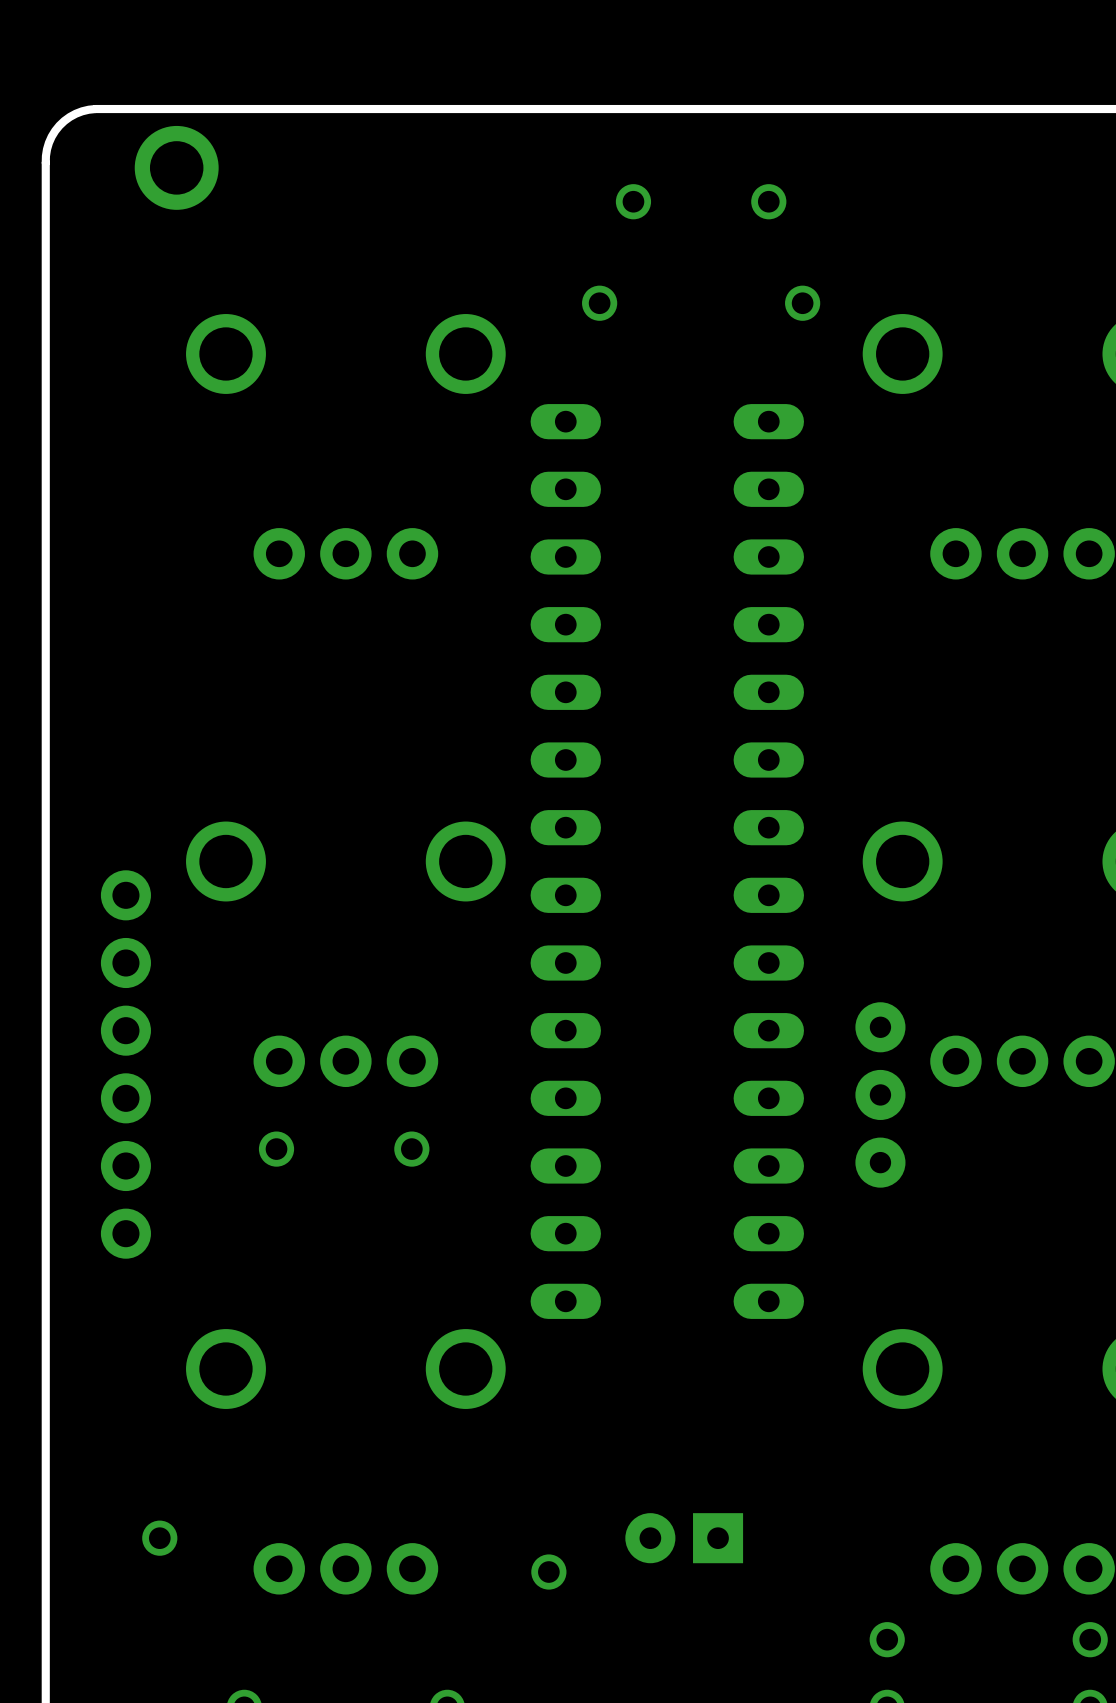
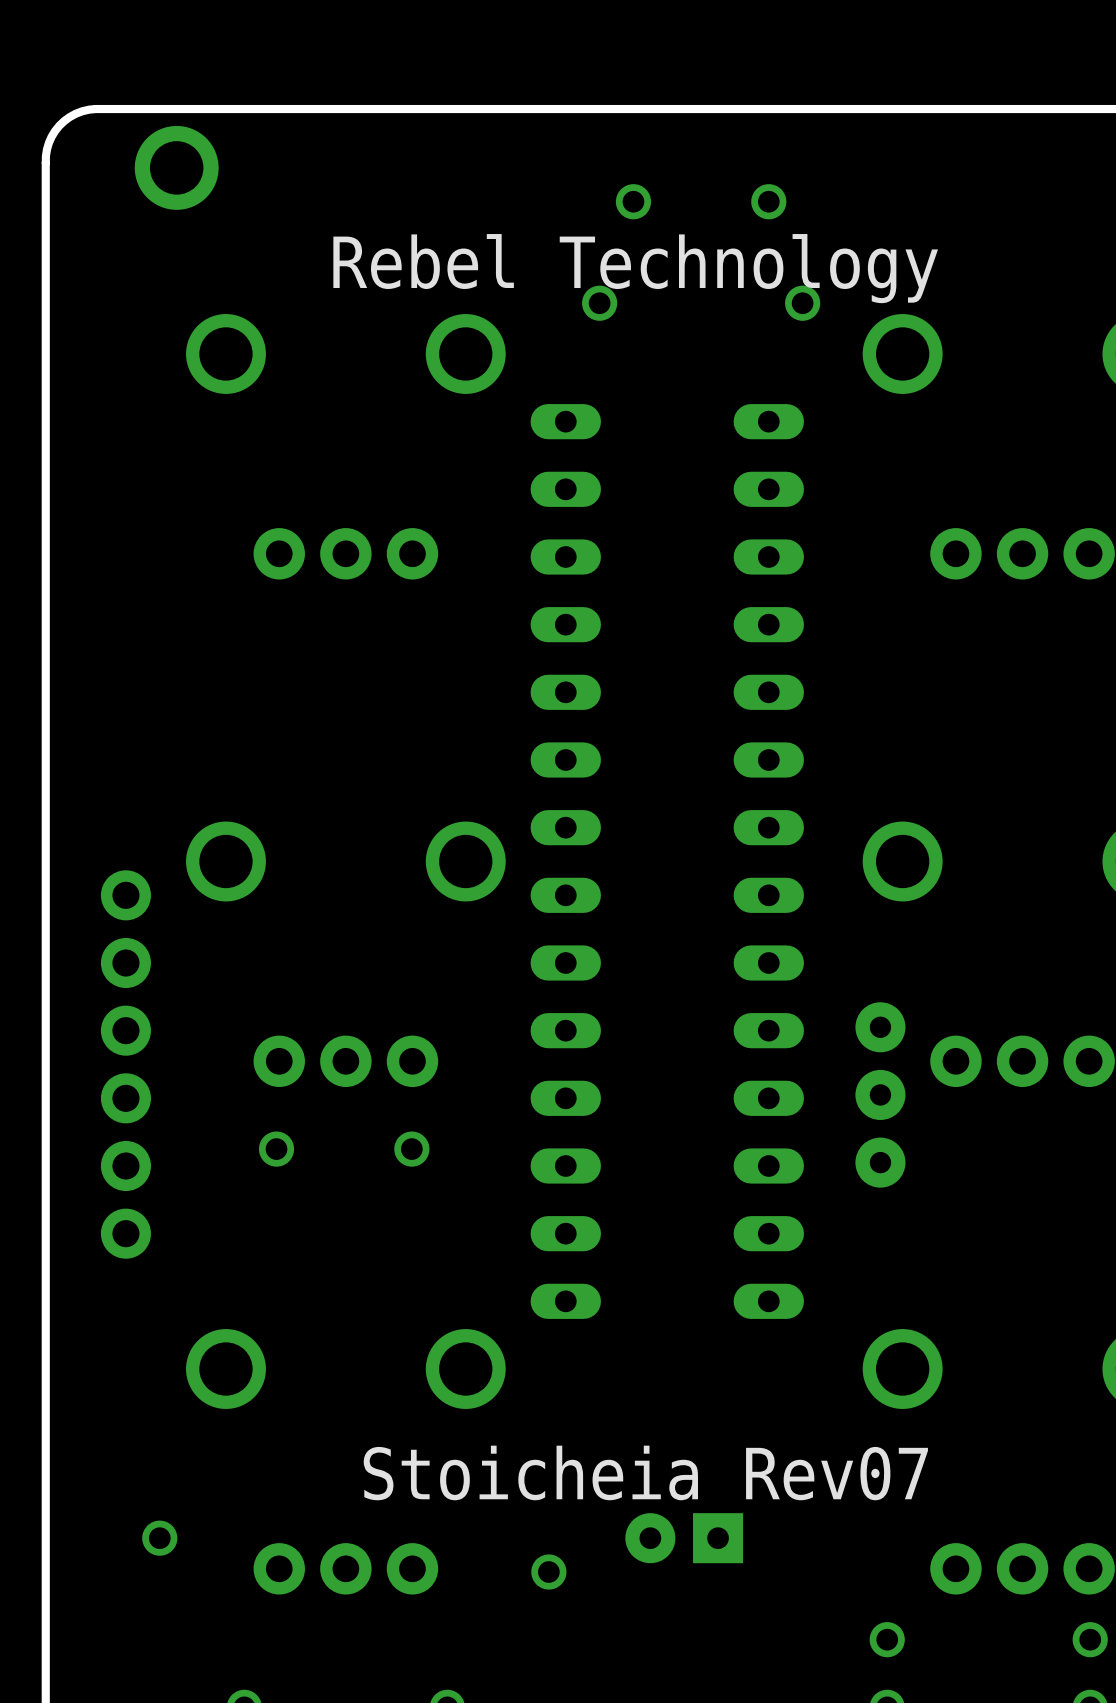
text: none -> Rebel Technology (635, 268)
text: none -> Stoicheia Rev07 (645, 1472)

